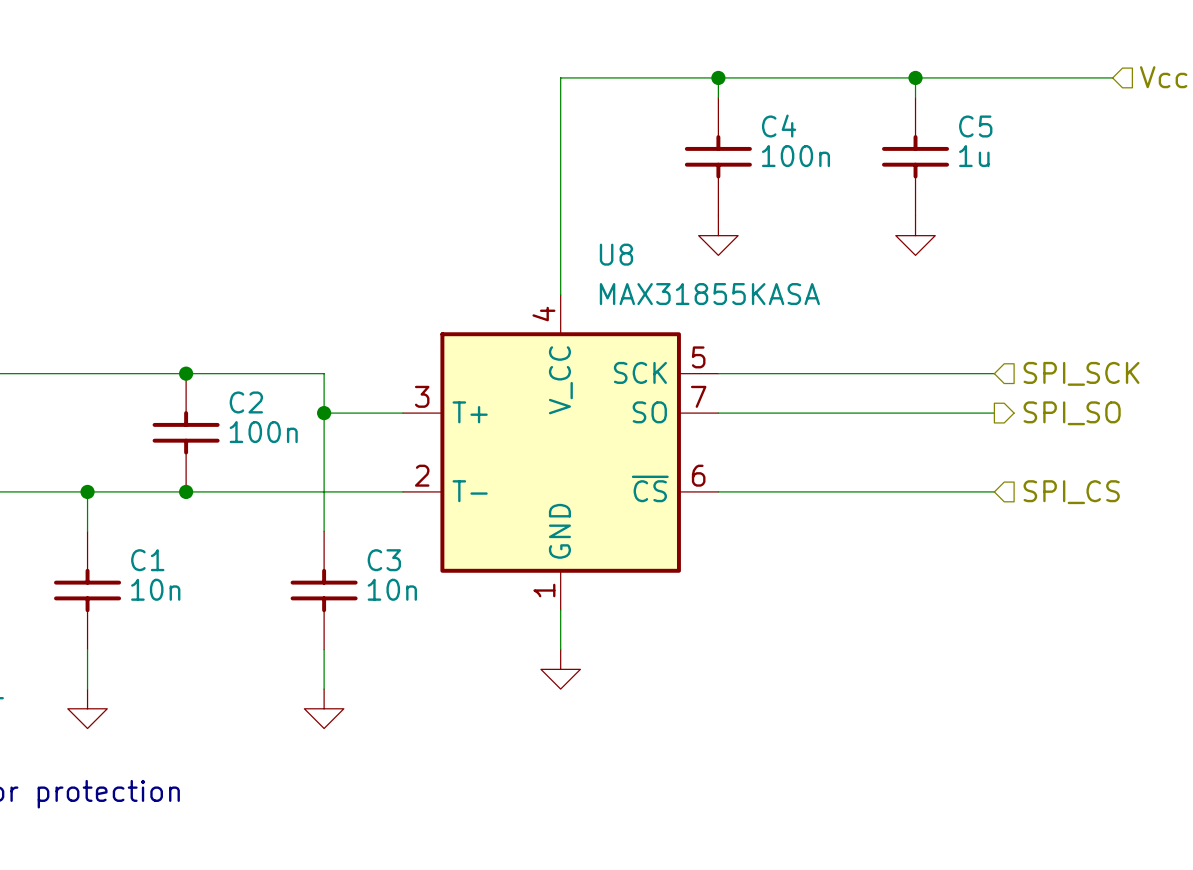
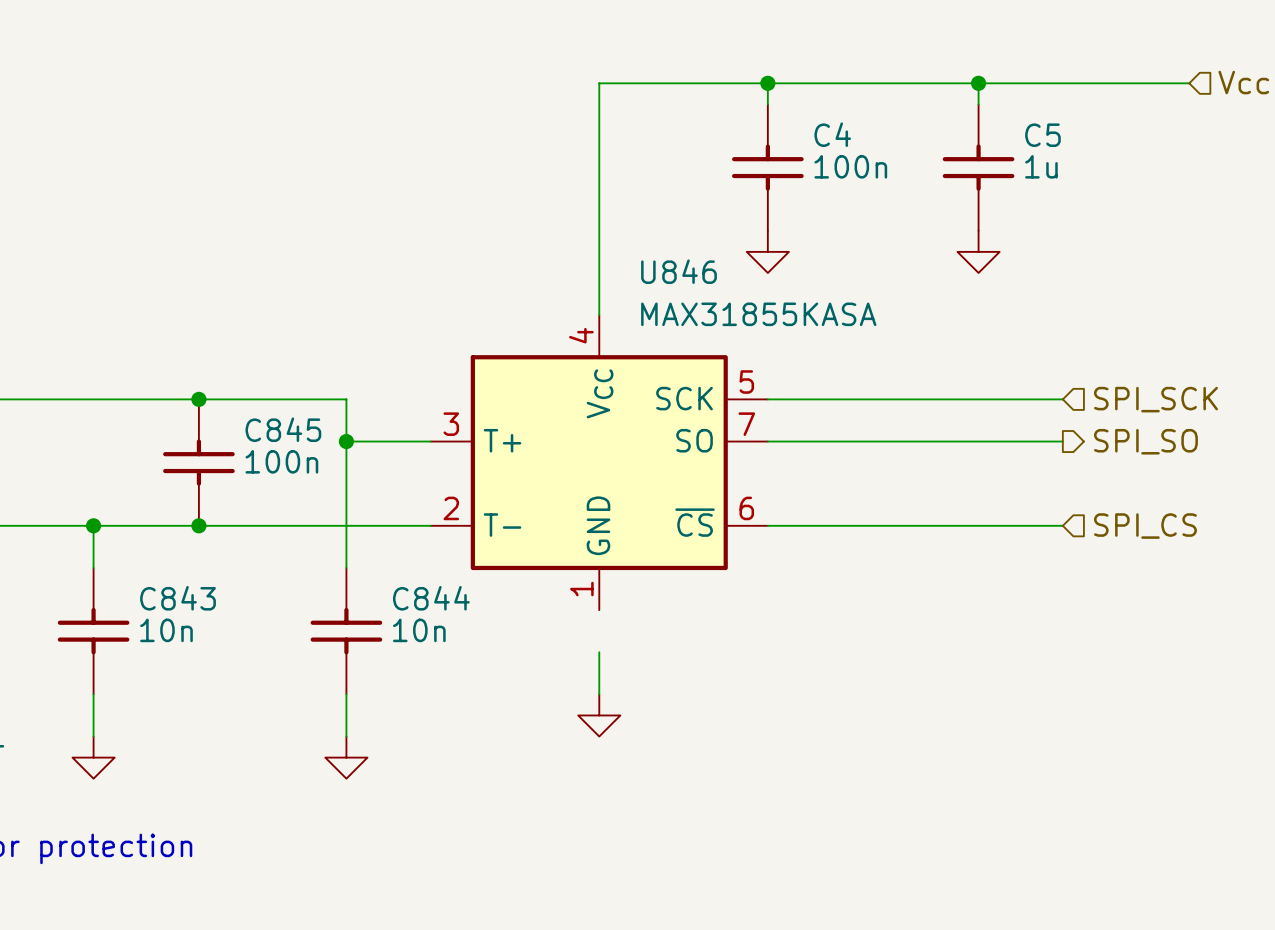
C2 name: C2 (246, 402) -> C845 (283, 429)
U846: none -> MAX31855KASA (599, 462)
U8: MAX31855KASA (560, 452) -> none
C1 name: C1 (147, 560) -> C843 (178, 598)
C3 name: C3 (384, 560) -> C844 (431, 598)

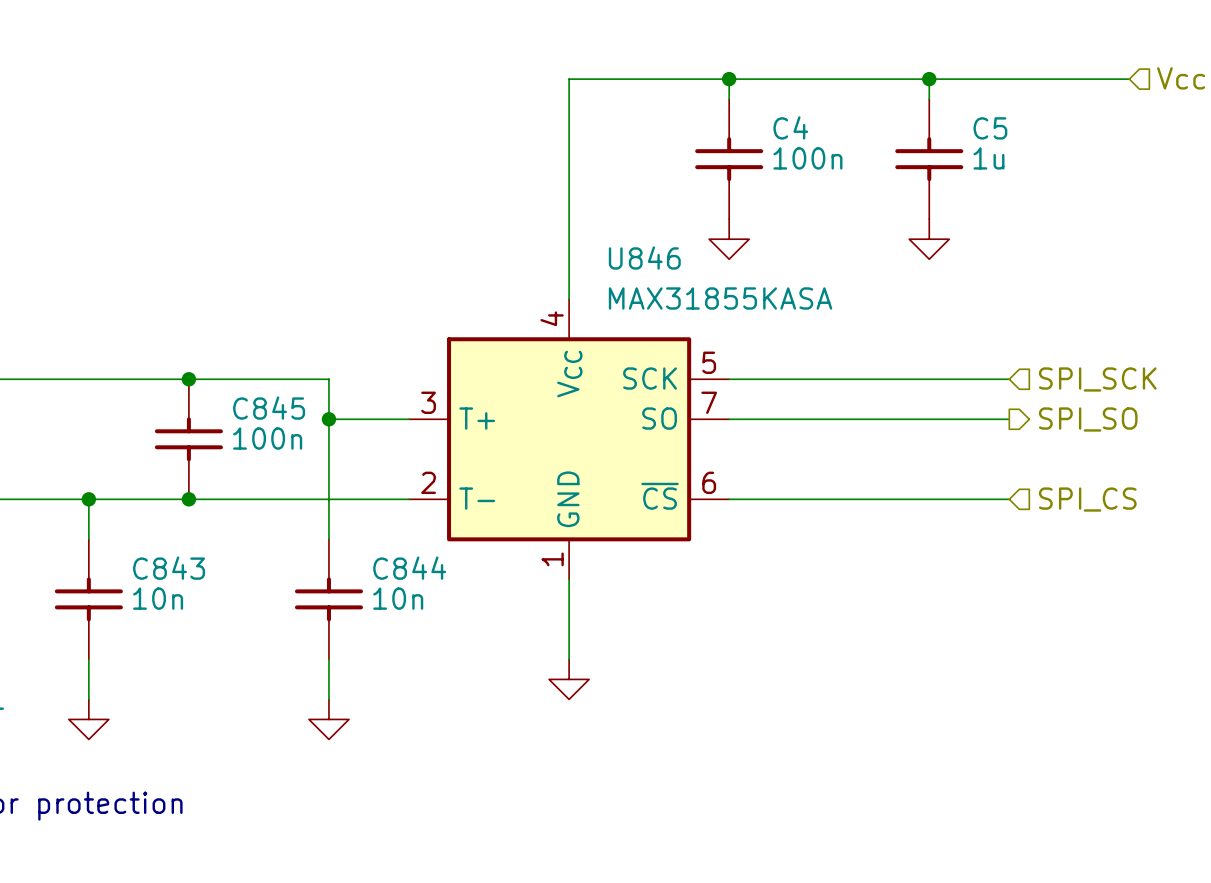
wire: none -> (569, 579) (569, 619)

